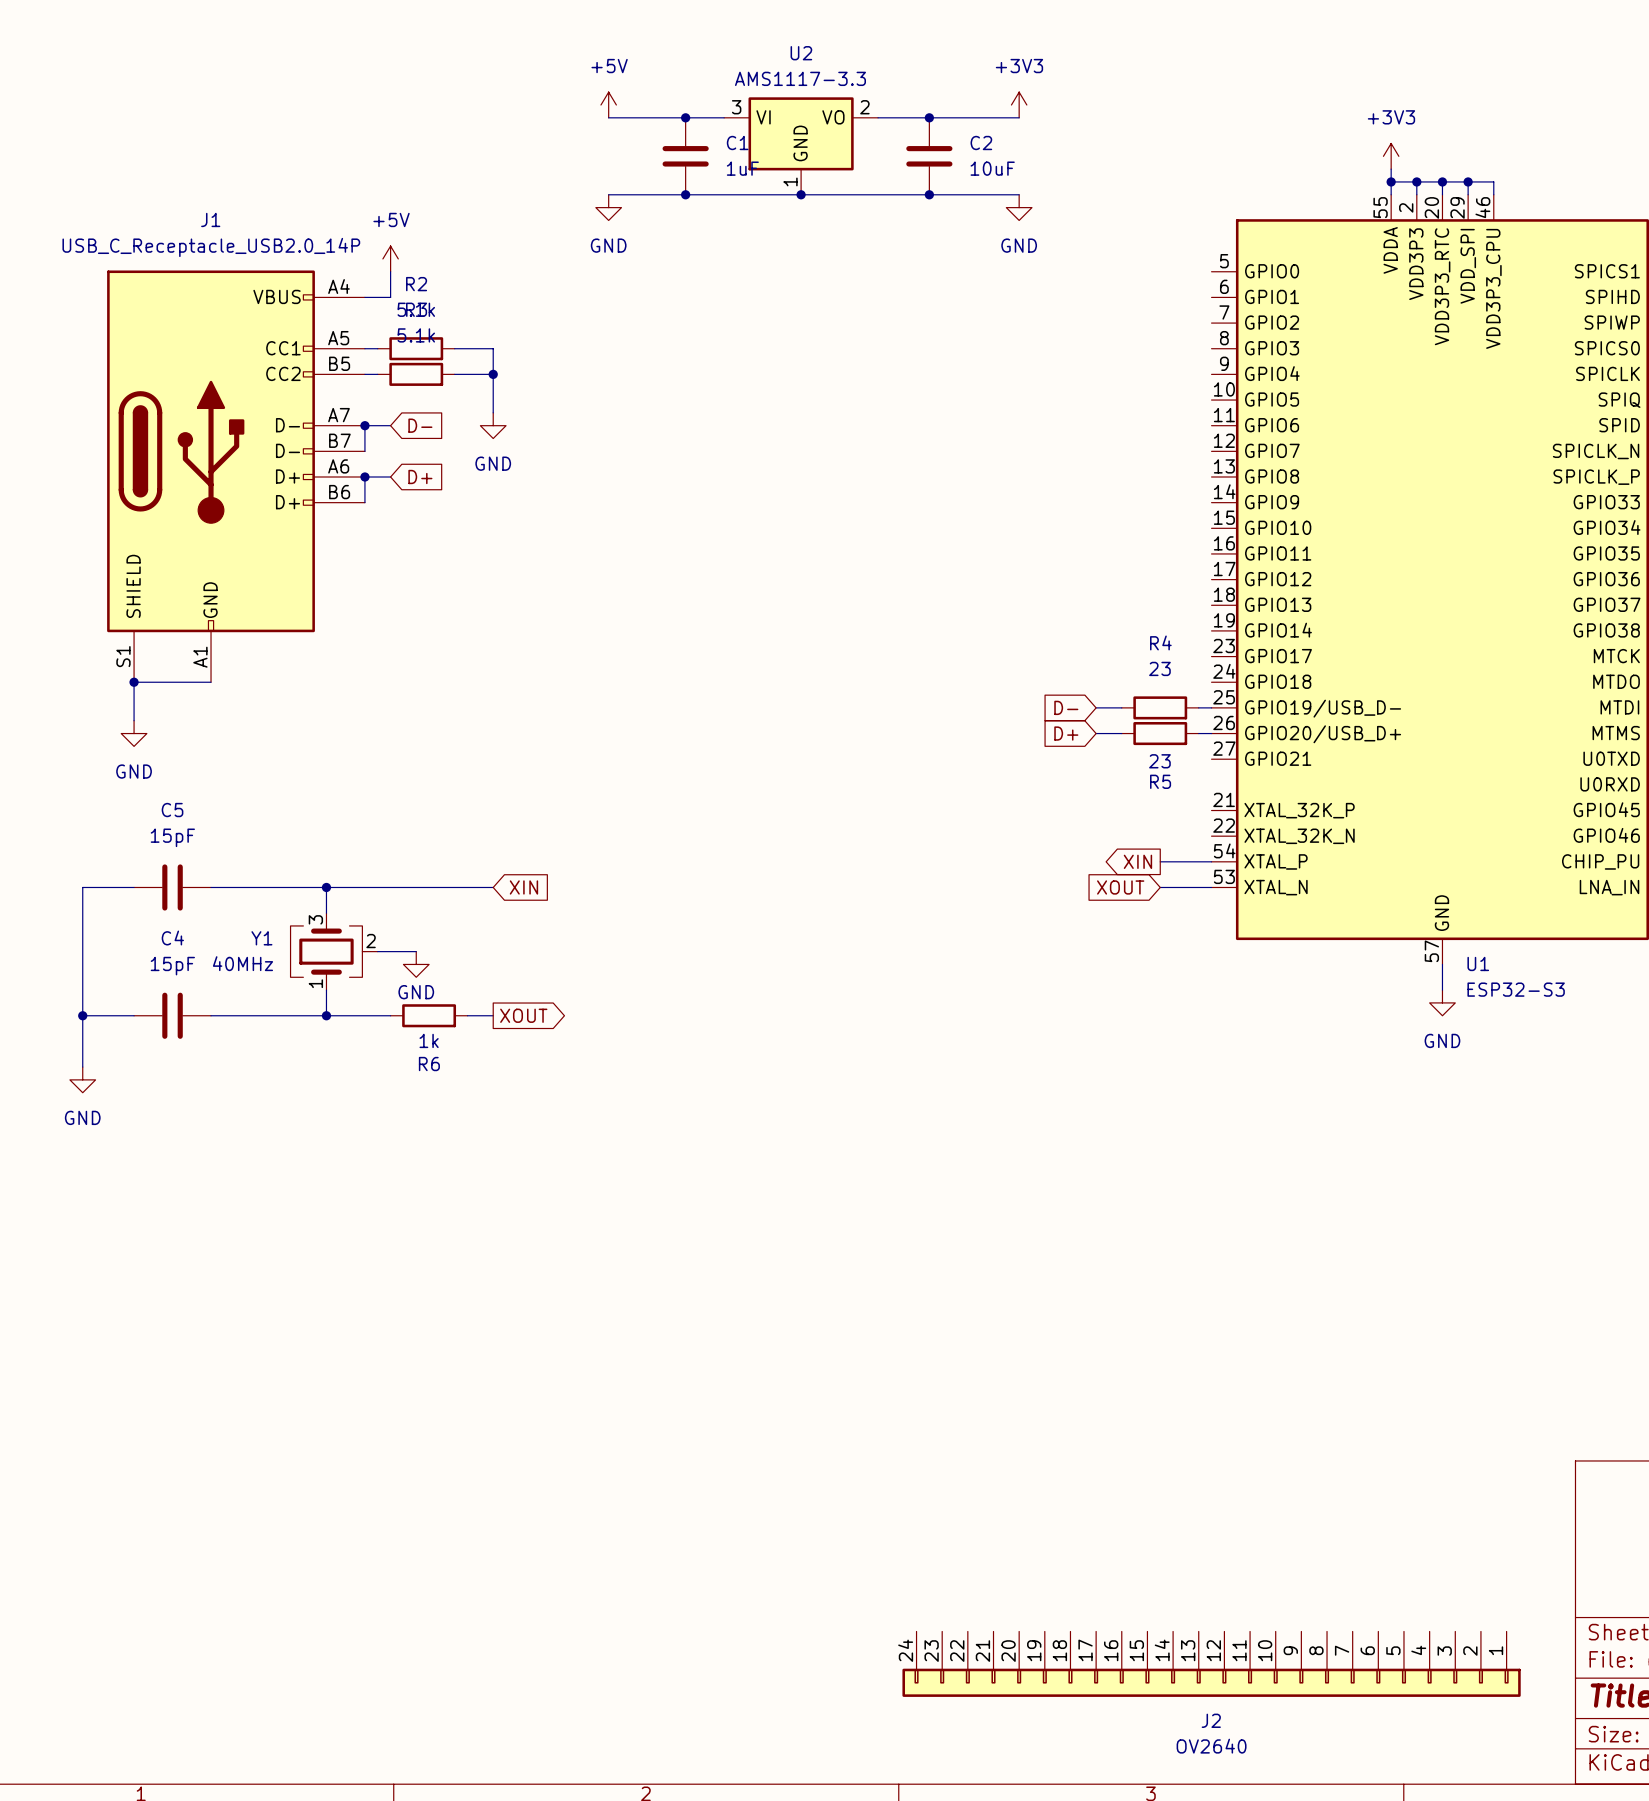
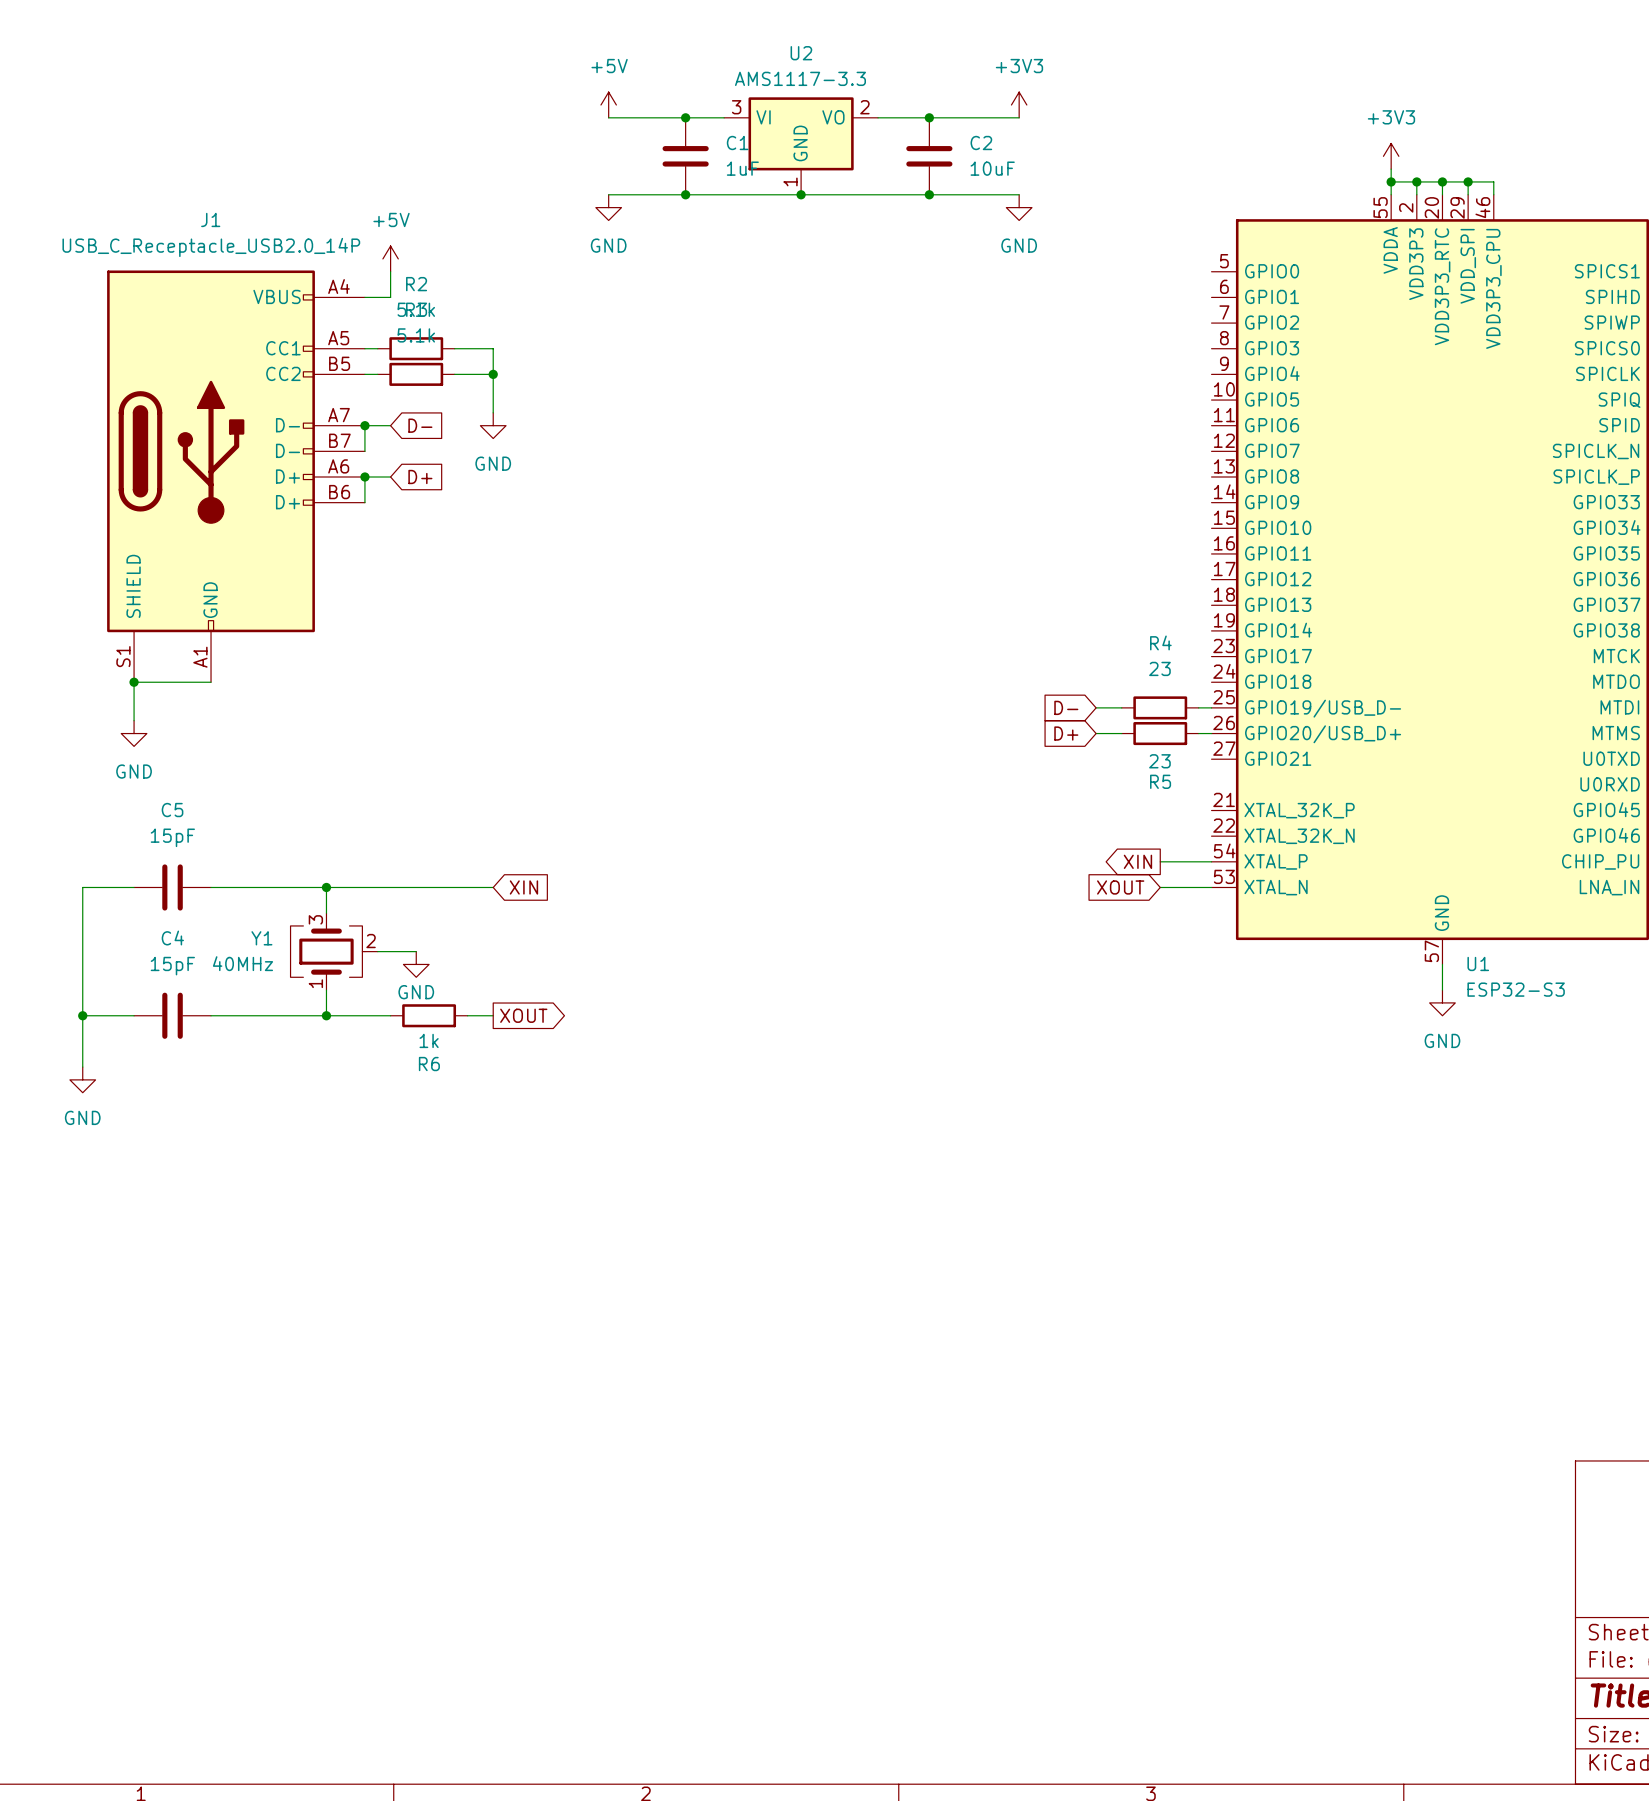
J2: OV2640 (1211, 1664) -> none

